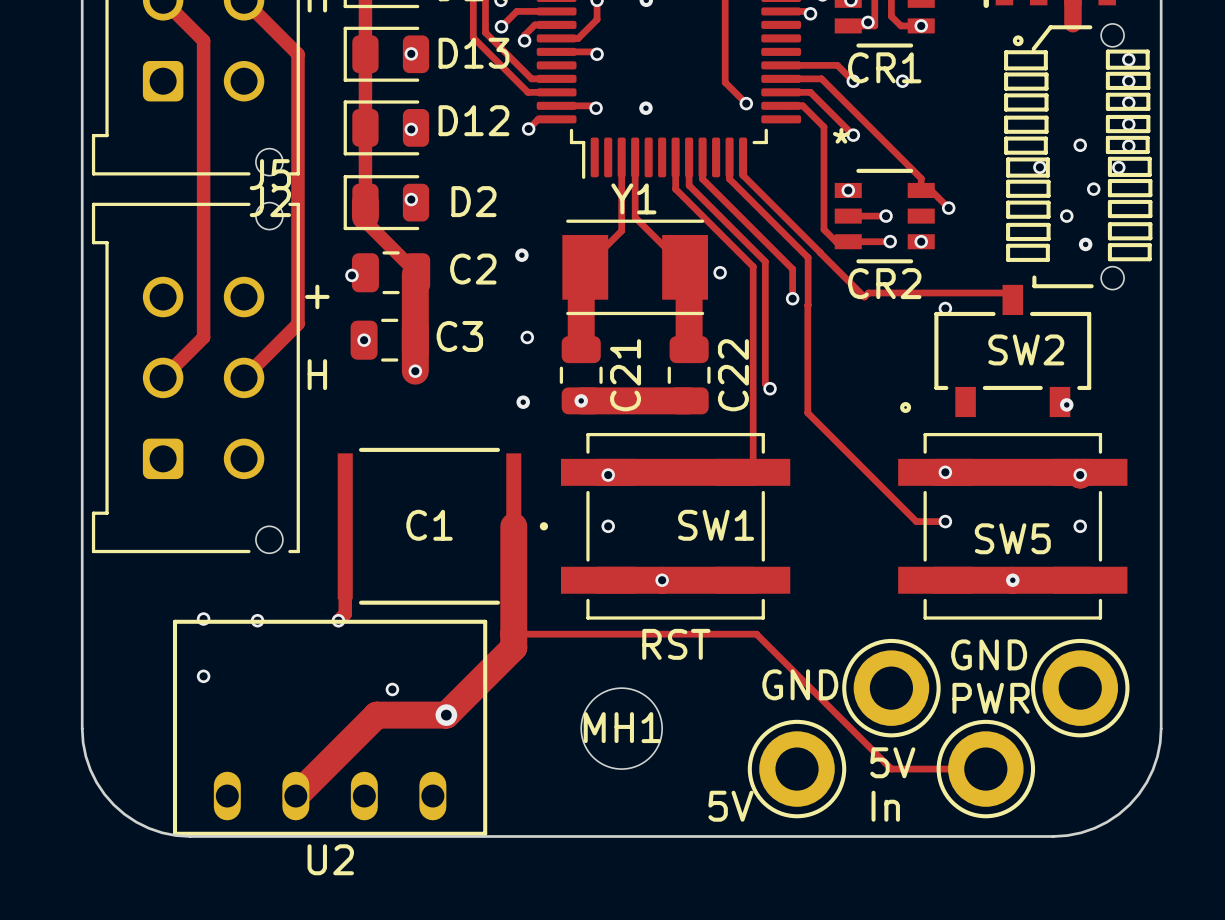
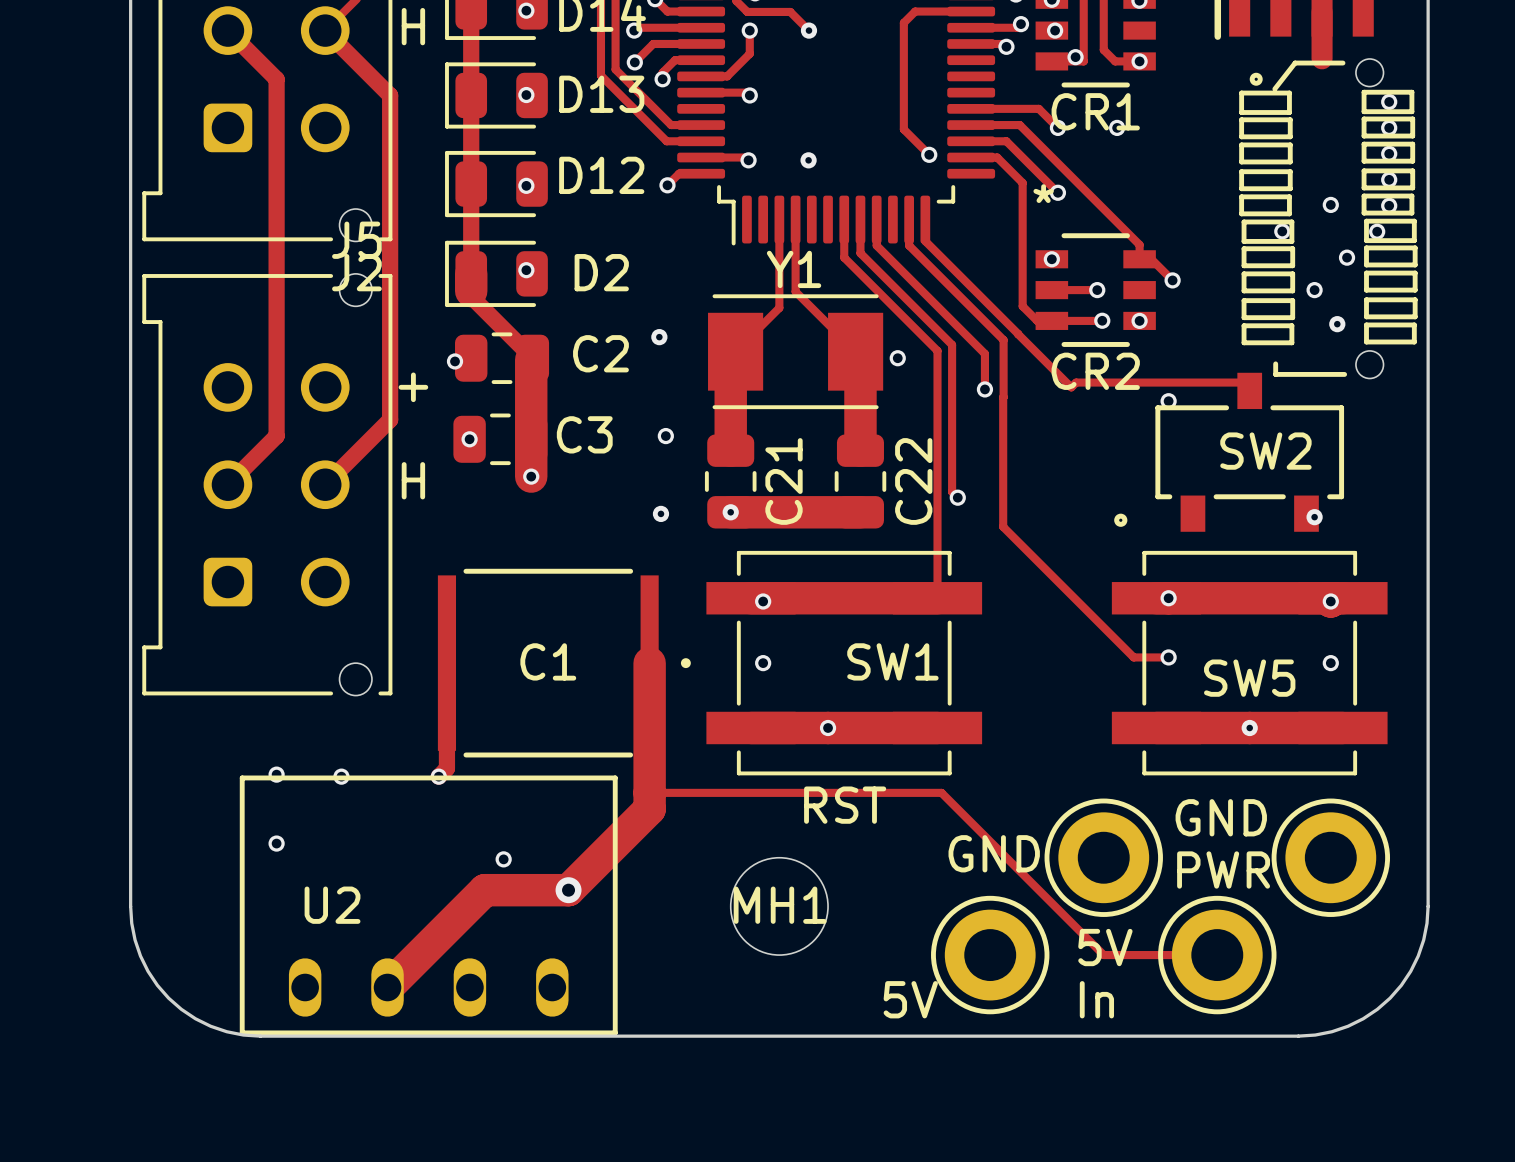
U2 name position: U2 (330, 859) -> U2 (332, 905)

